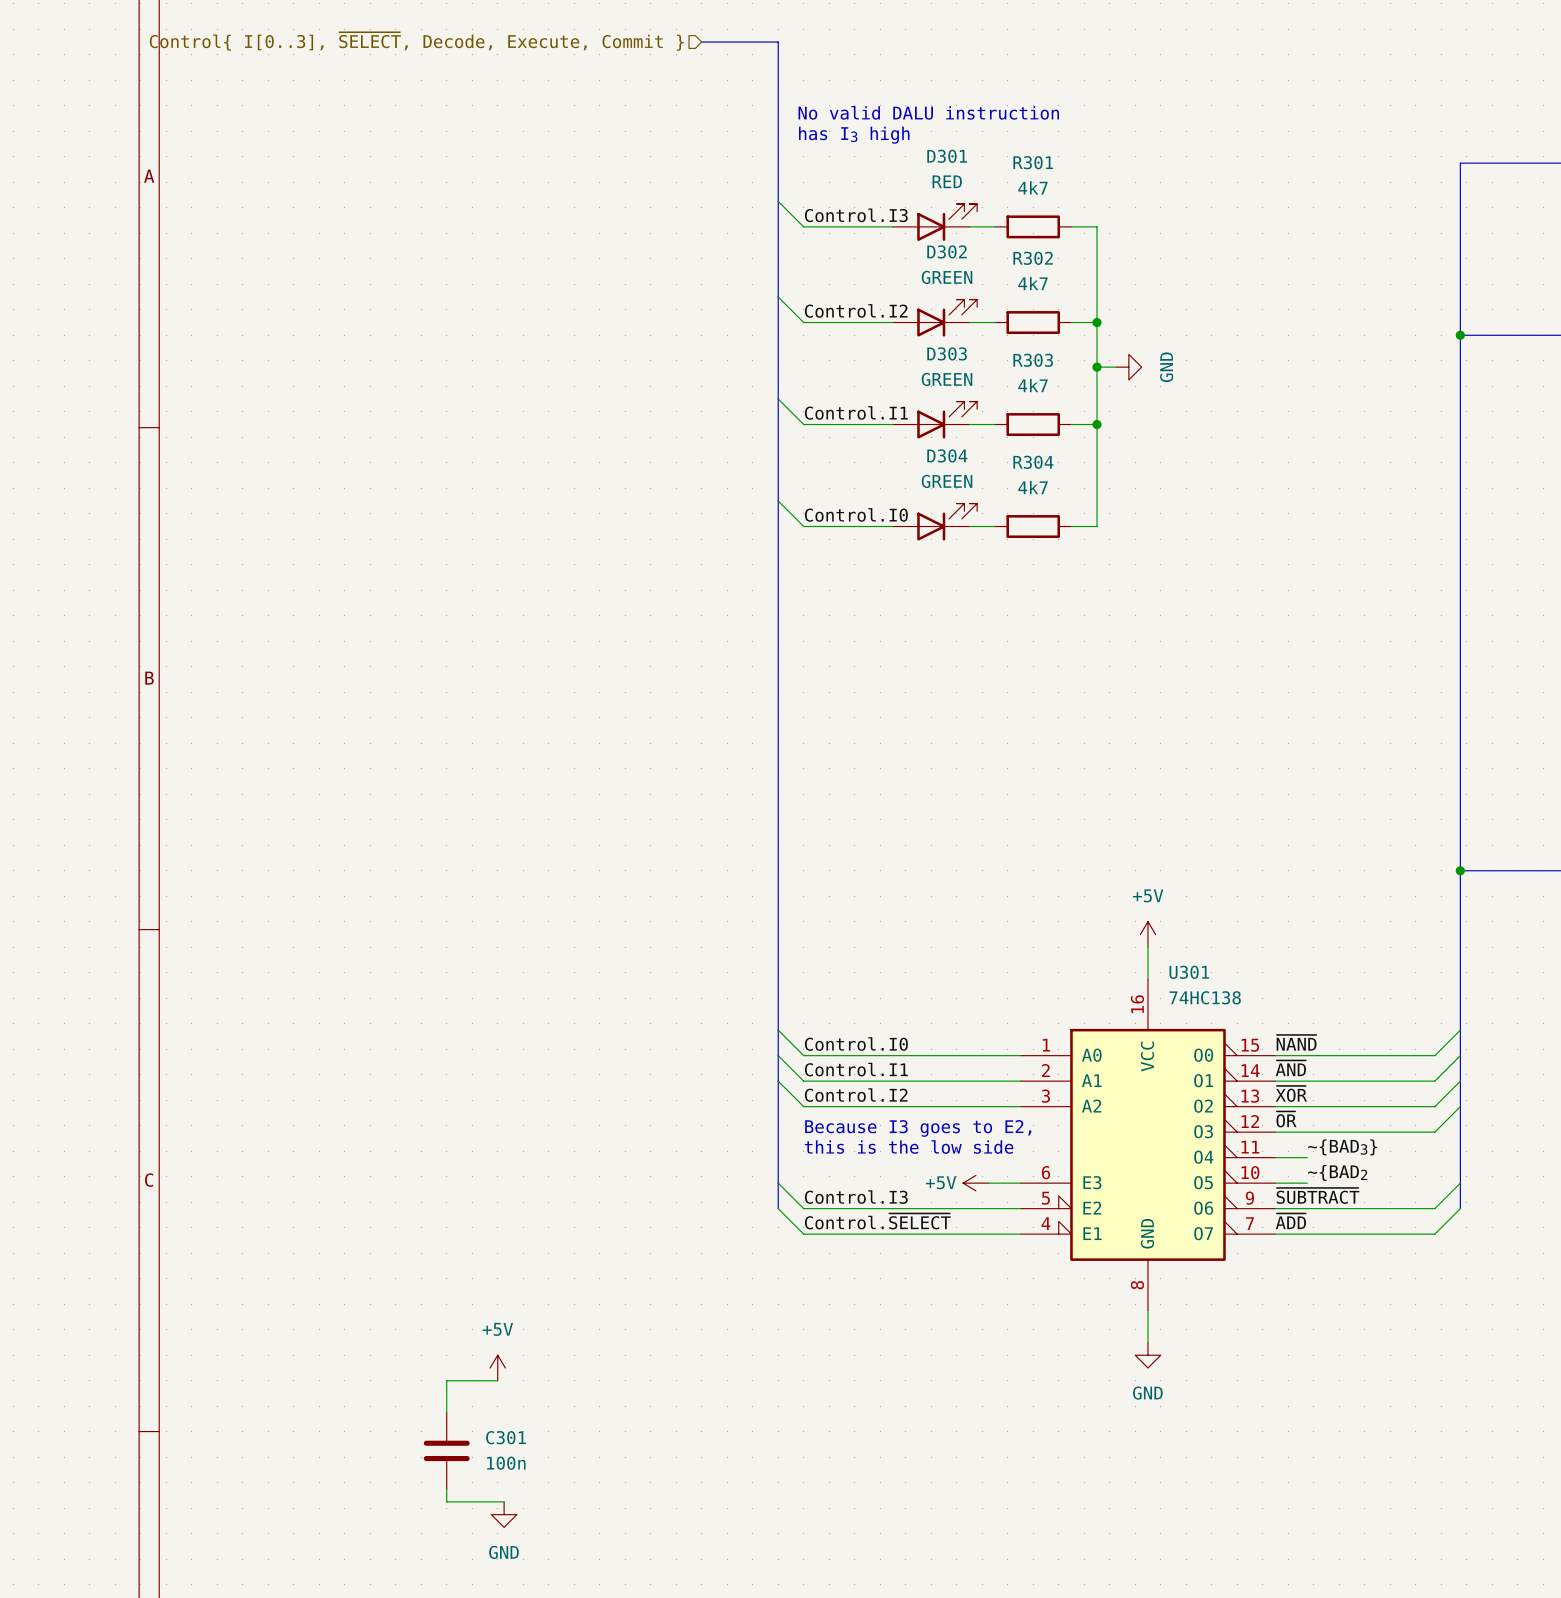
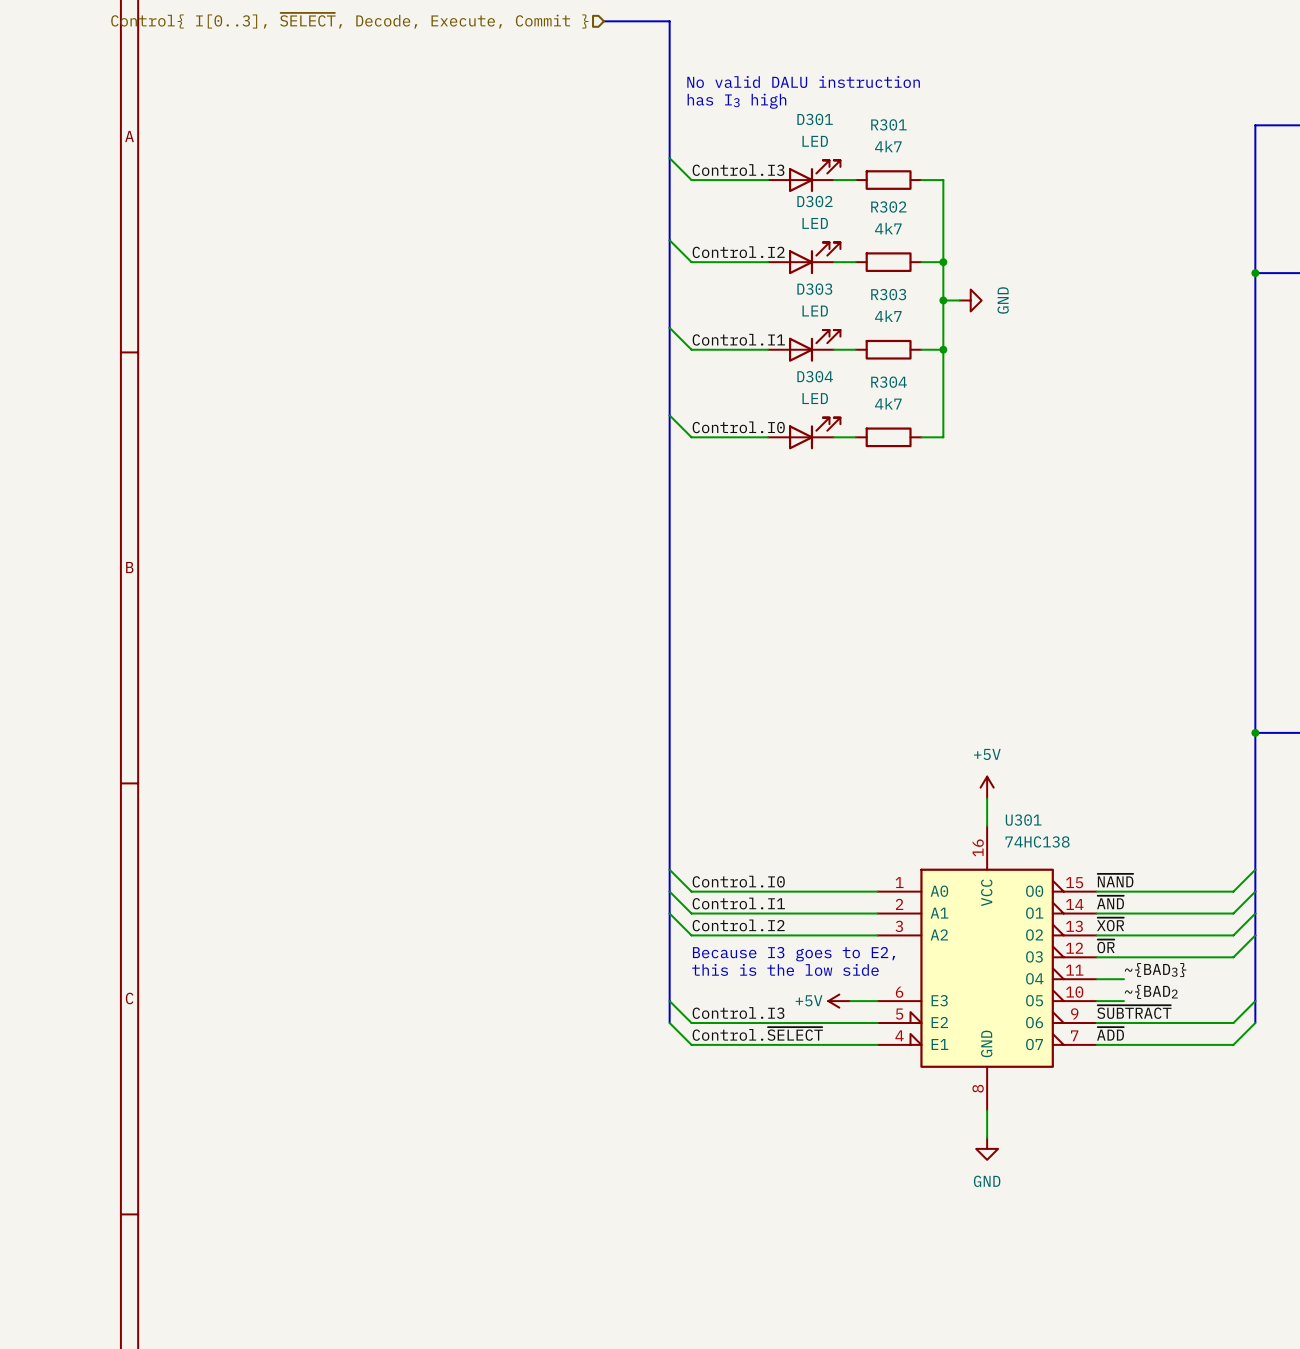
D301 value: RED (947, 181) -> LED (815, 141)
D302 value: GREEN (947, 277) -> LED (815, 223)
D303 value: GREEN (947, 379) -> LED (815, 311)
D304 value: GREEN (947, 481) -> LED (815, 398)
power symbol: +5V (497, 1368) -> none
wire: (497, 1380) (446, 1380) (446, 1412) -> none
C301: 100n (446, 1450) -> none
wire: (446, 1489) (446, 1501) (504, 1501) -> none
power symbol: GND (504, 1514) -> none

